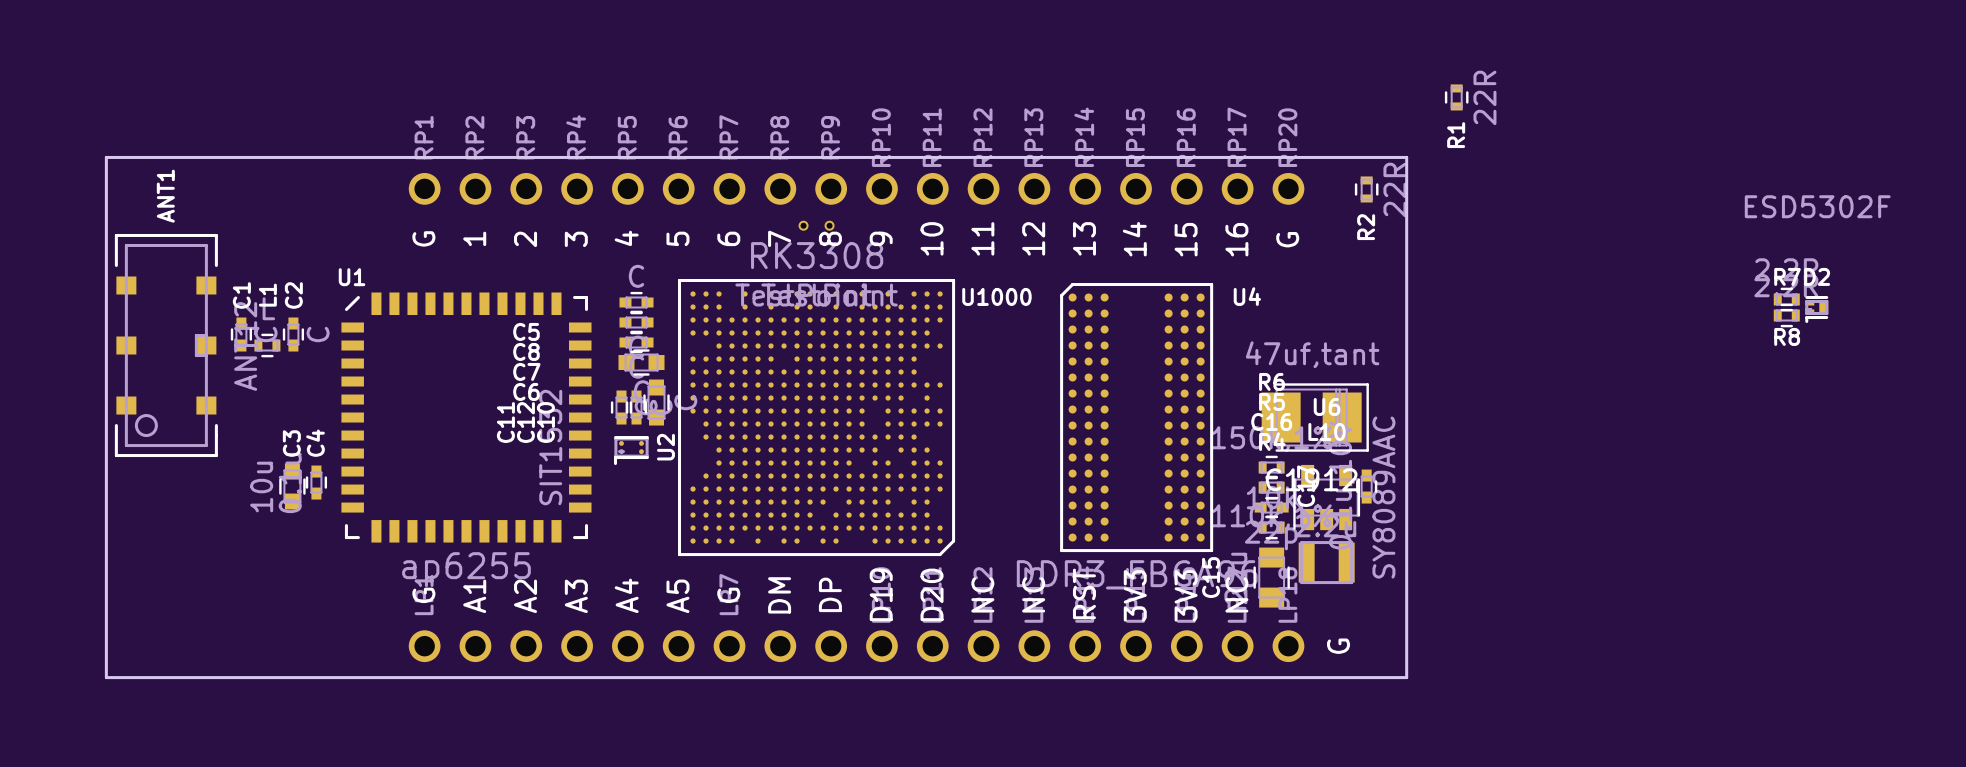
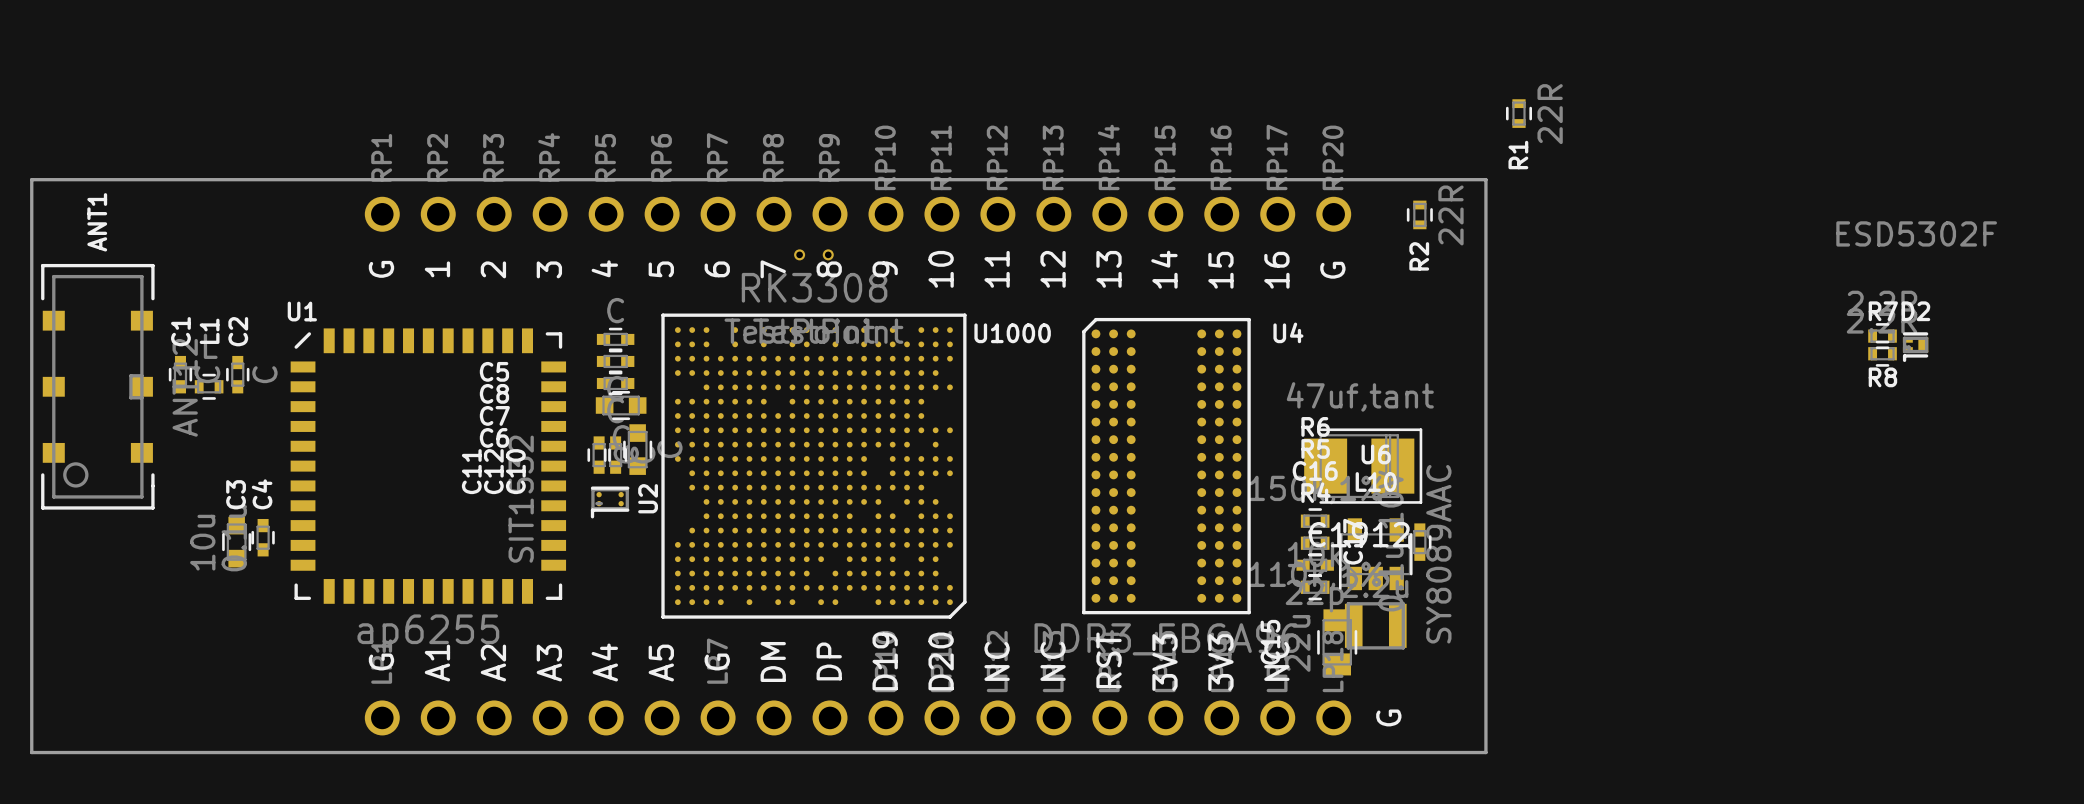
board edge: (1406, 157) (1406, 677) -> (1463, 179) (1485, 179) (1485, 752) (1463, 752)
C15 position: (1271, 577) -> (1337, 642)

